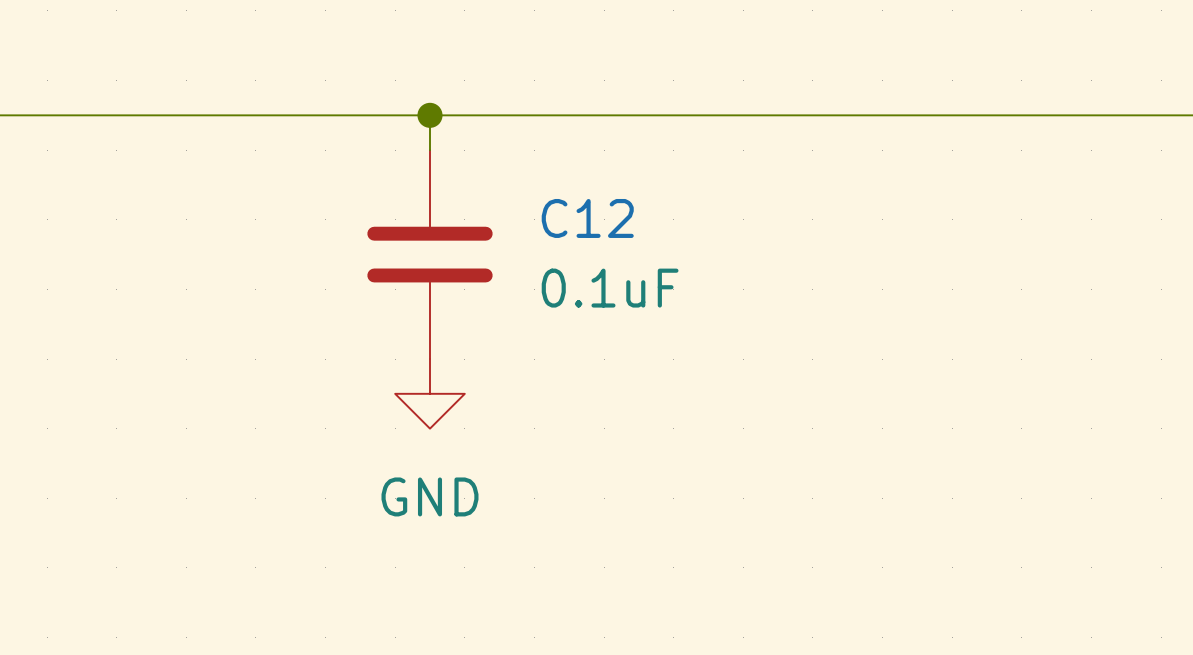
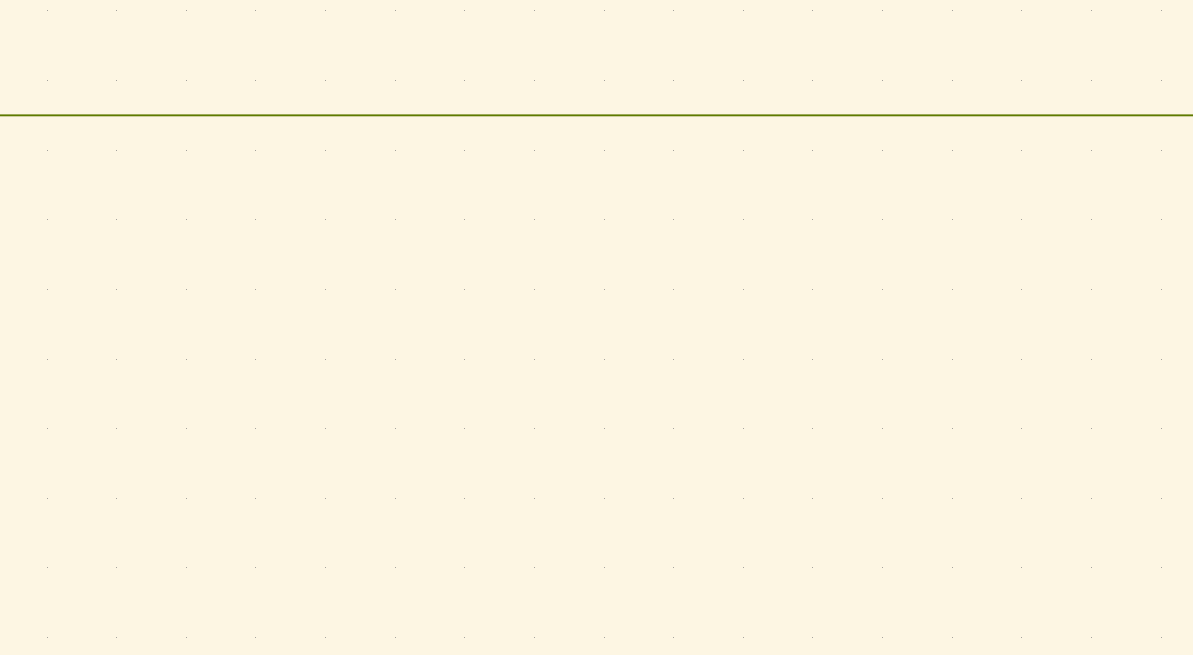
wire: (429, 115) (429, 150) -> none
junction: (429, 115) -> none
C12: 0.1uF (429, 254) -> none
power symbol: GND (429, 393) -> none

